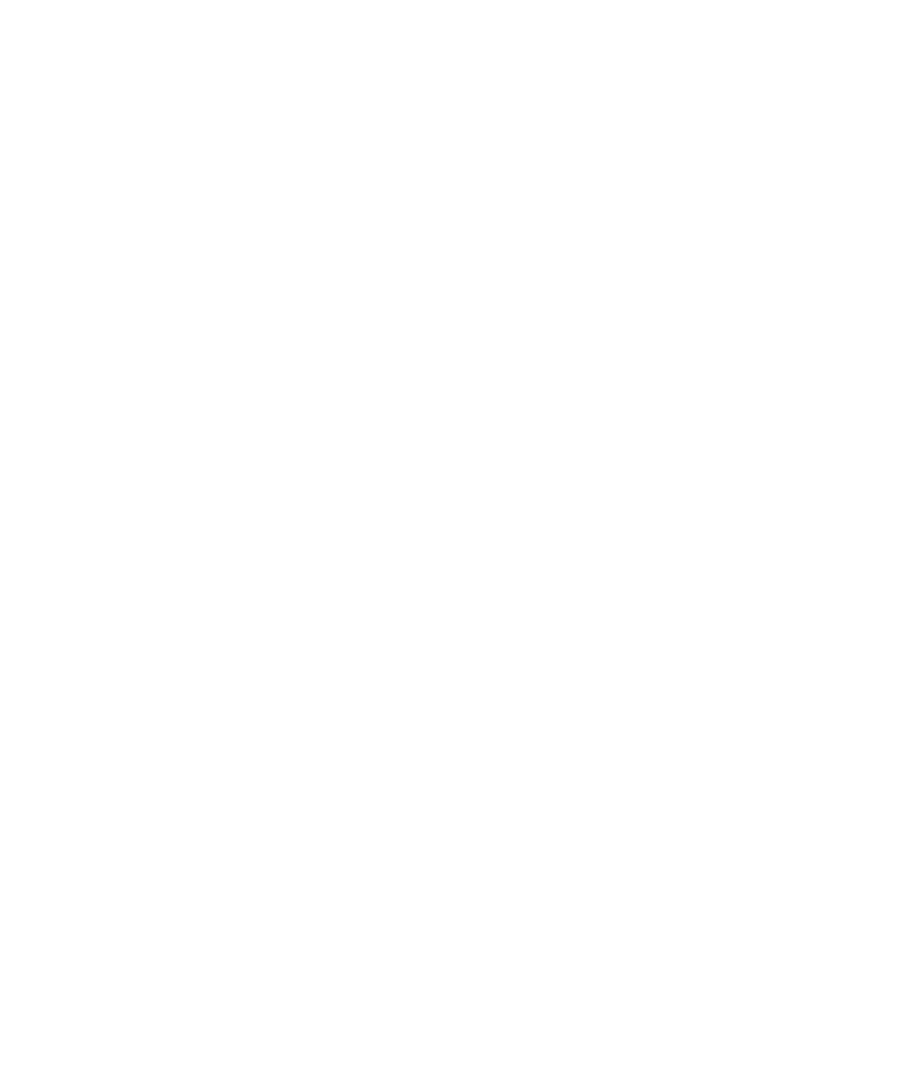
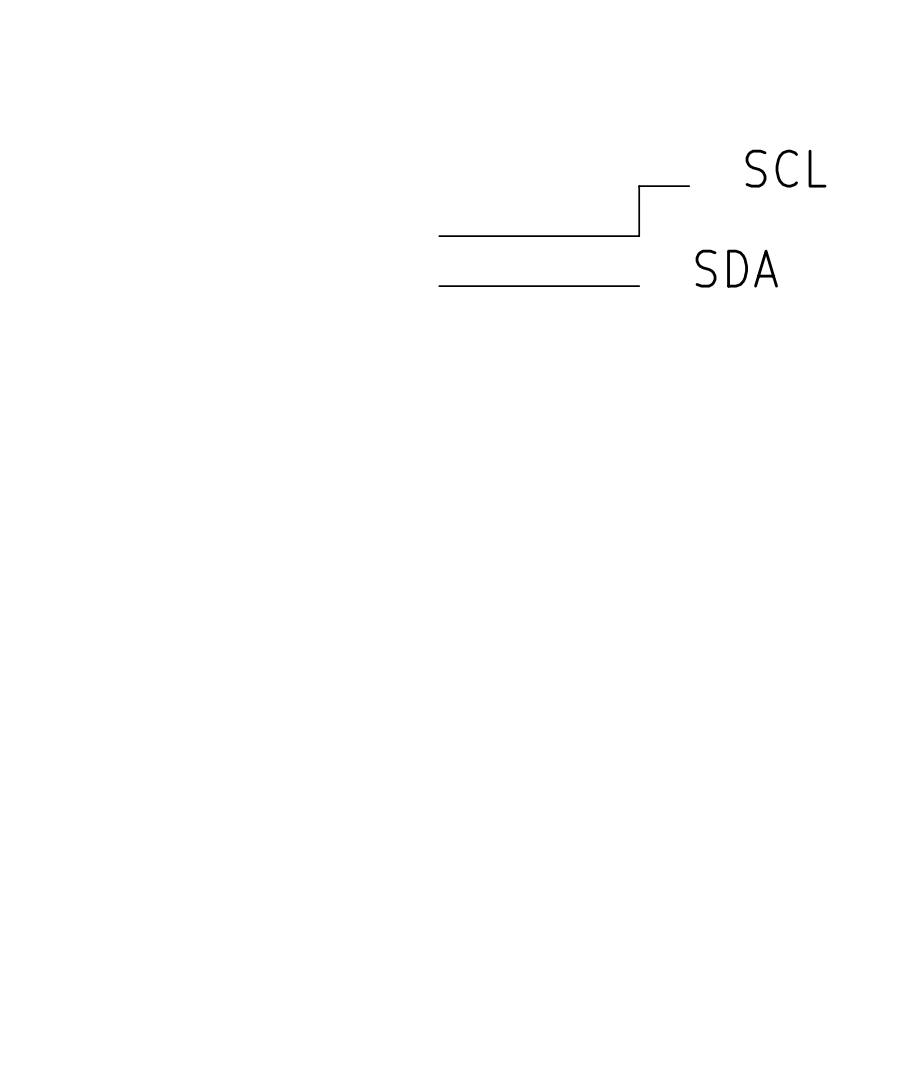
label: none -> SCL (786, 168)
wire: none -> (689, 186) (639, 186) (639, 236) (439, 236)
label: none -> SDA (736, 268)
wire: none -> (439, 286) (639, 286)

